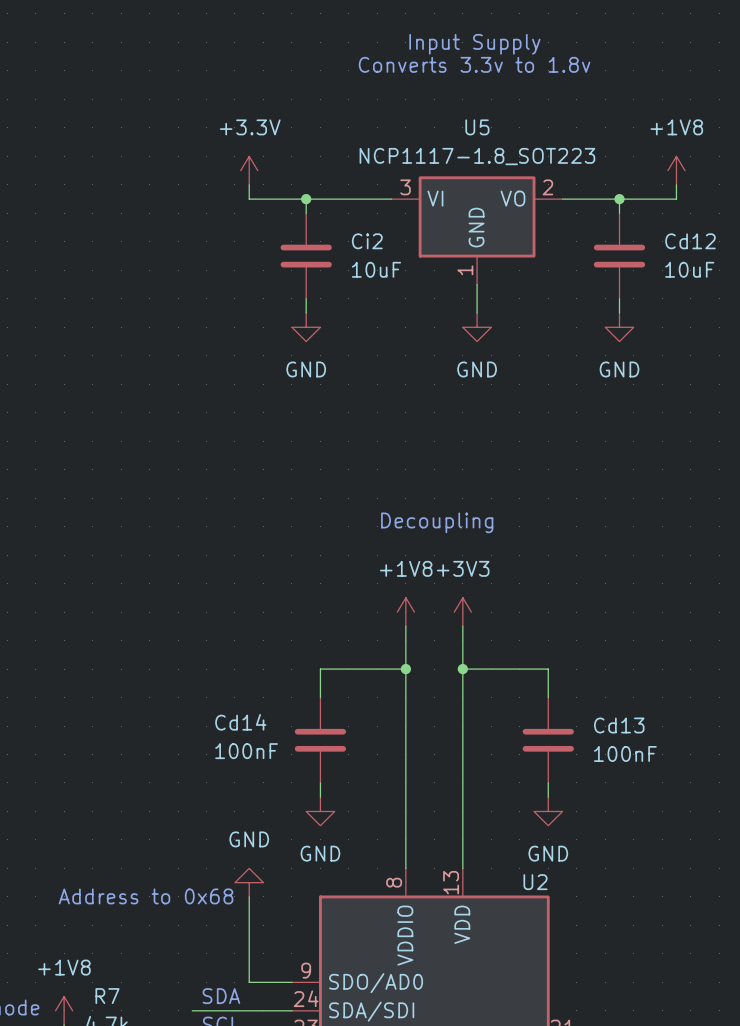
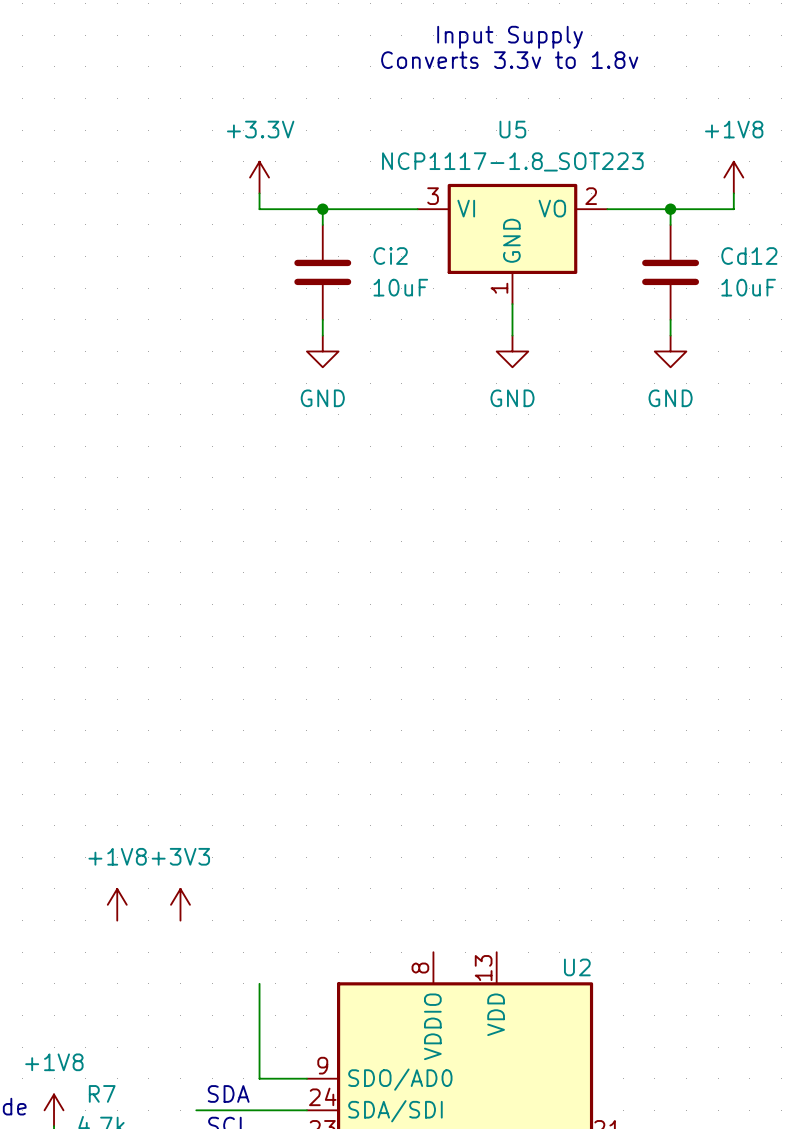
text: Decoupling (437, 522) -> none
power symbol: +1V8 (405, 612) -> none
power symbol: +3V3 (462, 612) -> none
wire: (405, 626) (405, 868) -> none
wire: (462, 626) (462, 868) -> none
wire: (405, 669) (320, 669) (320, 697) -> none
junction: (405, 669) -> none
wire: (462, 669) (548, 669) (548, 697) -> none
junction: (462, 669) -> none
Cd14: 100nF (320, 740) -> none
Cd13: 100nF (548, 740) -> none
wire: (320, 782) (320, 797) -> none
wire: (548, 782) (548, 797) -> none
power symbol: GND (320, 811) -> none
power symbol: GND (548, 811) -> none
power symbol: none -> +1V8 (117, 904)
power symbol: none -> +3V3 (180, 904)
power symbol: GND (249, 882) -> none
text: Address to 0x68 (146, 896) -> none

